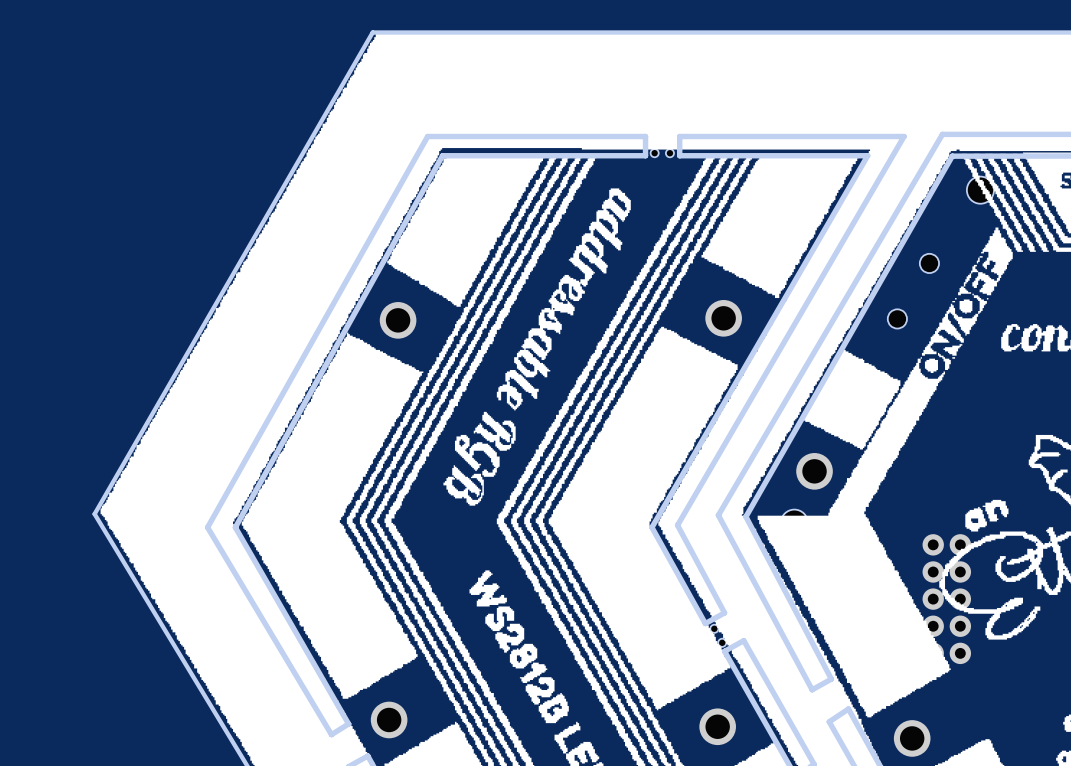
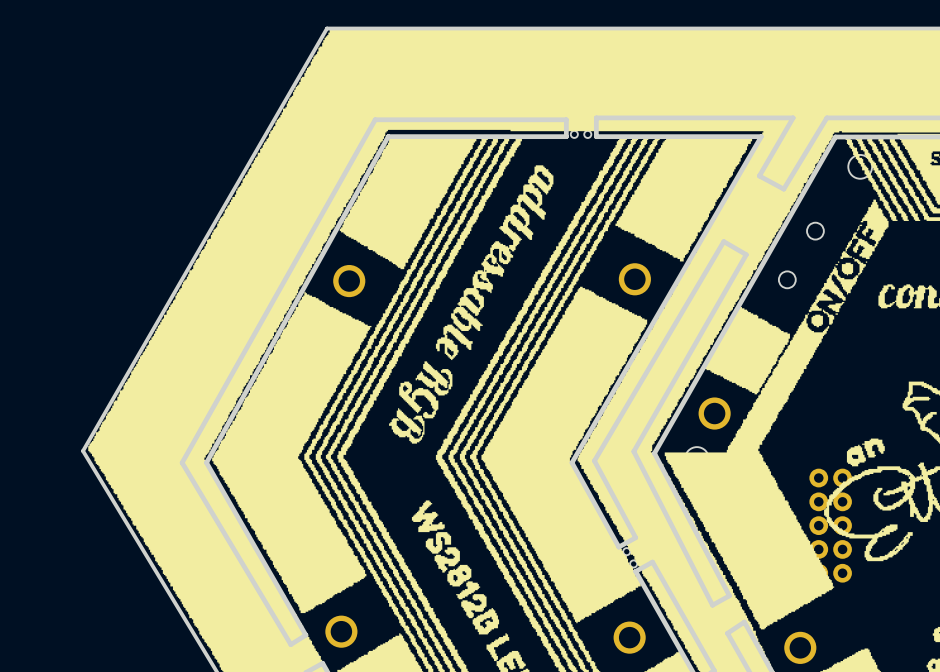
board edge: (942, 134) (718, 515) (812, 689) -> (594, 460) (723, 241) (746, 254) (633, 451) (712, 605)
board edge: (679, 136) (904, 136) (677, 525) -> (596, 119) (596, 117) (793, 117) (759, 176) (783, 189) (826, 117)

